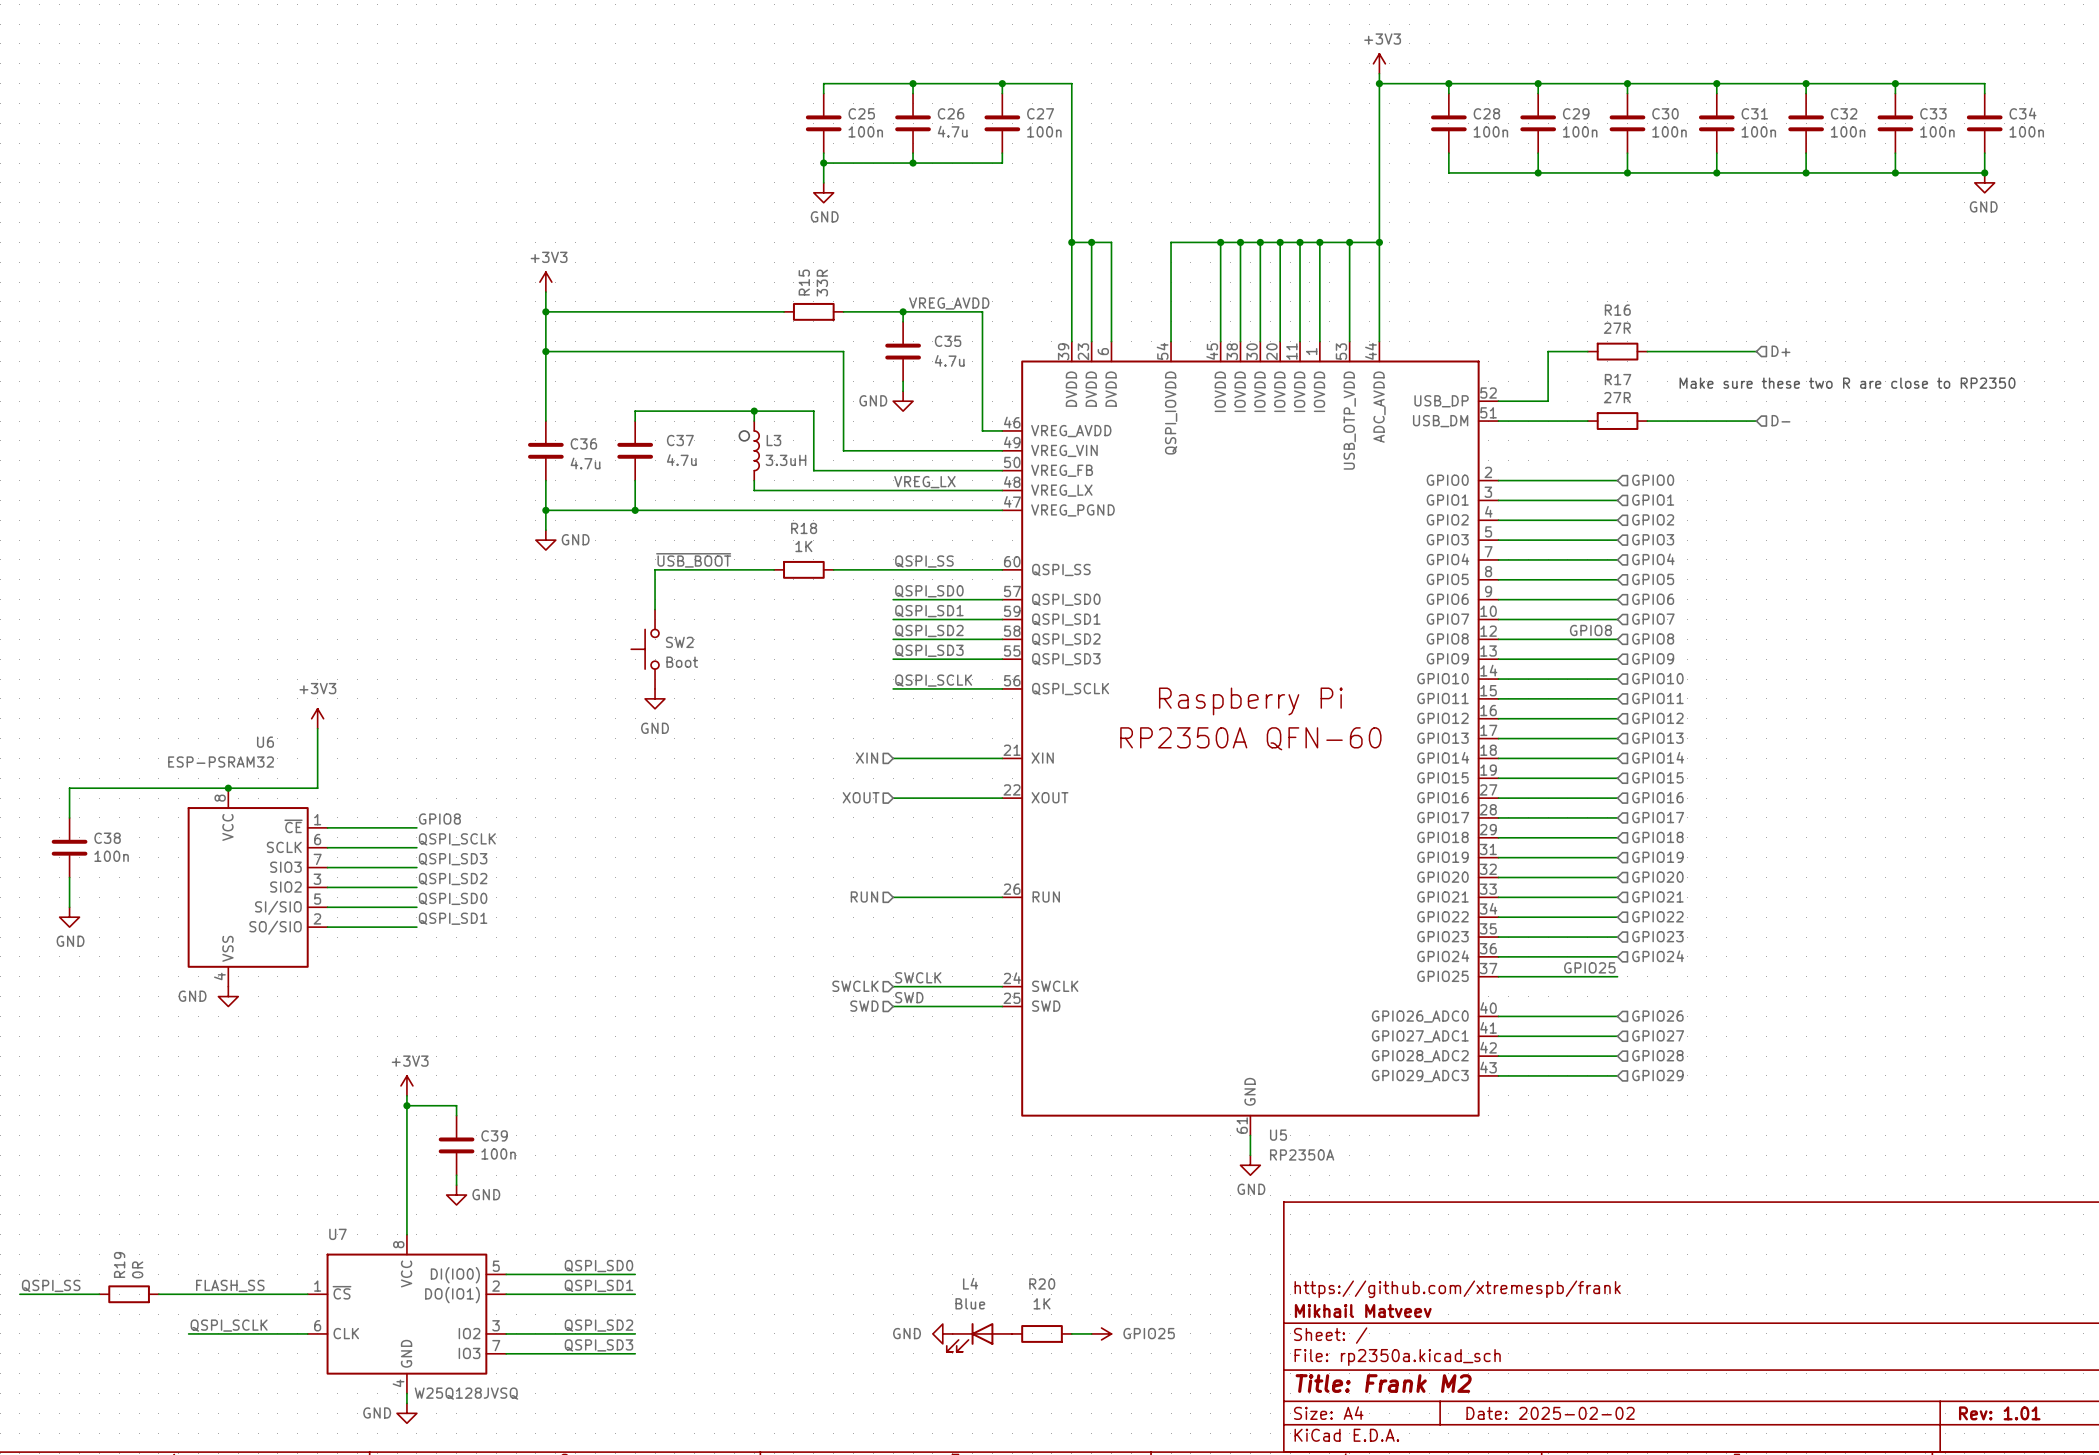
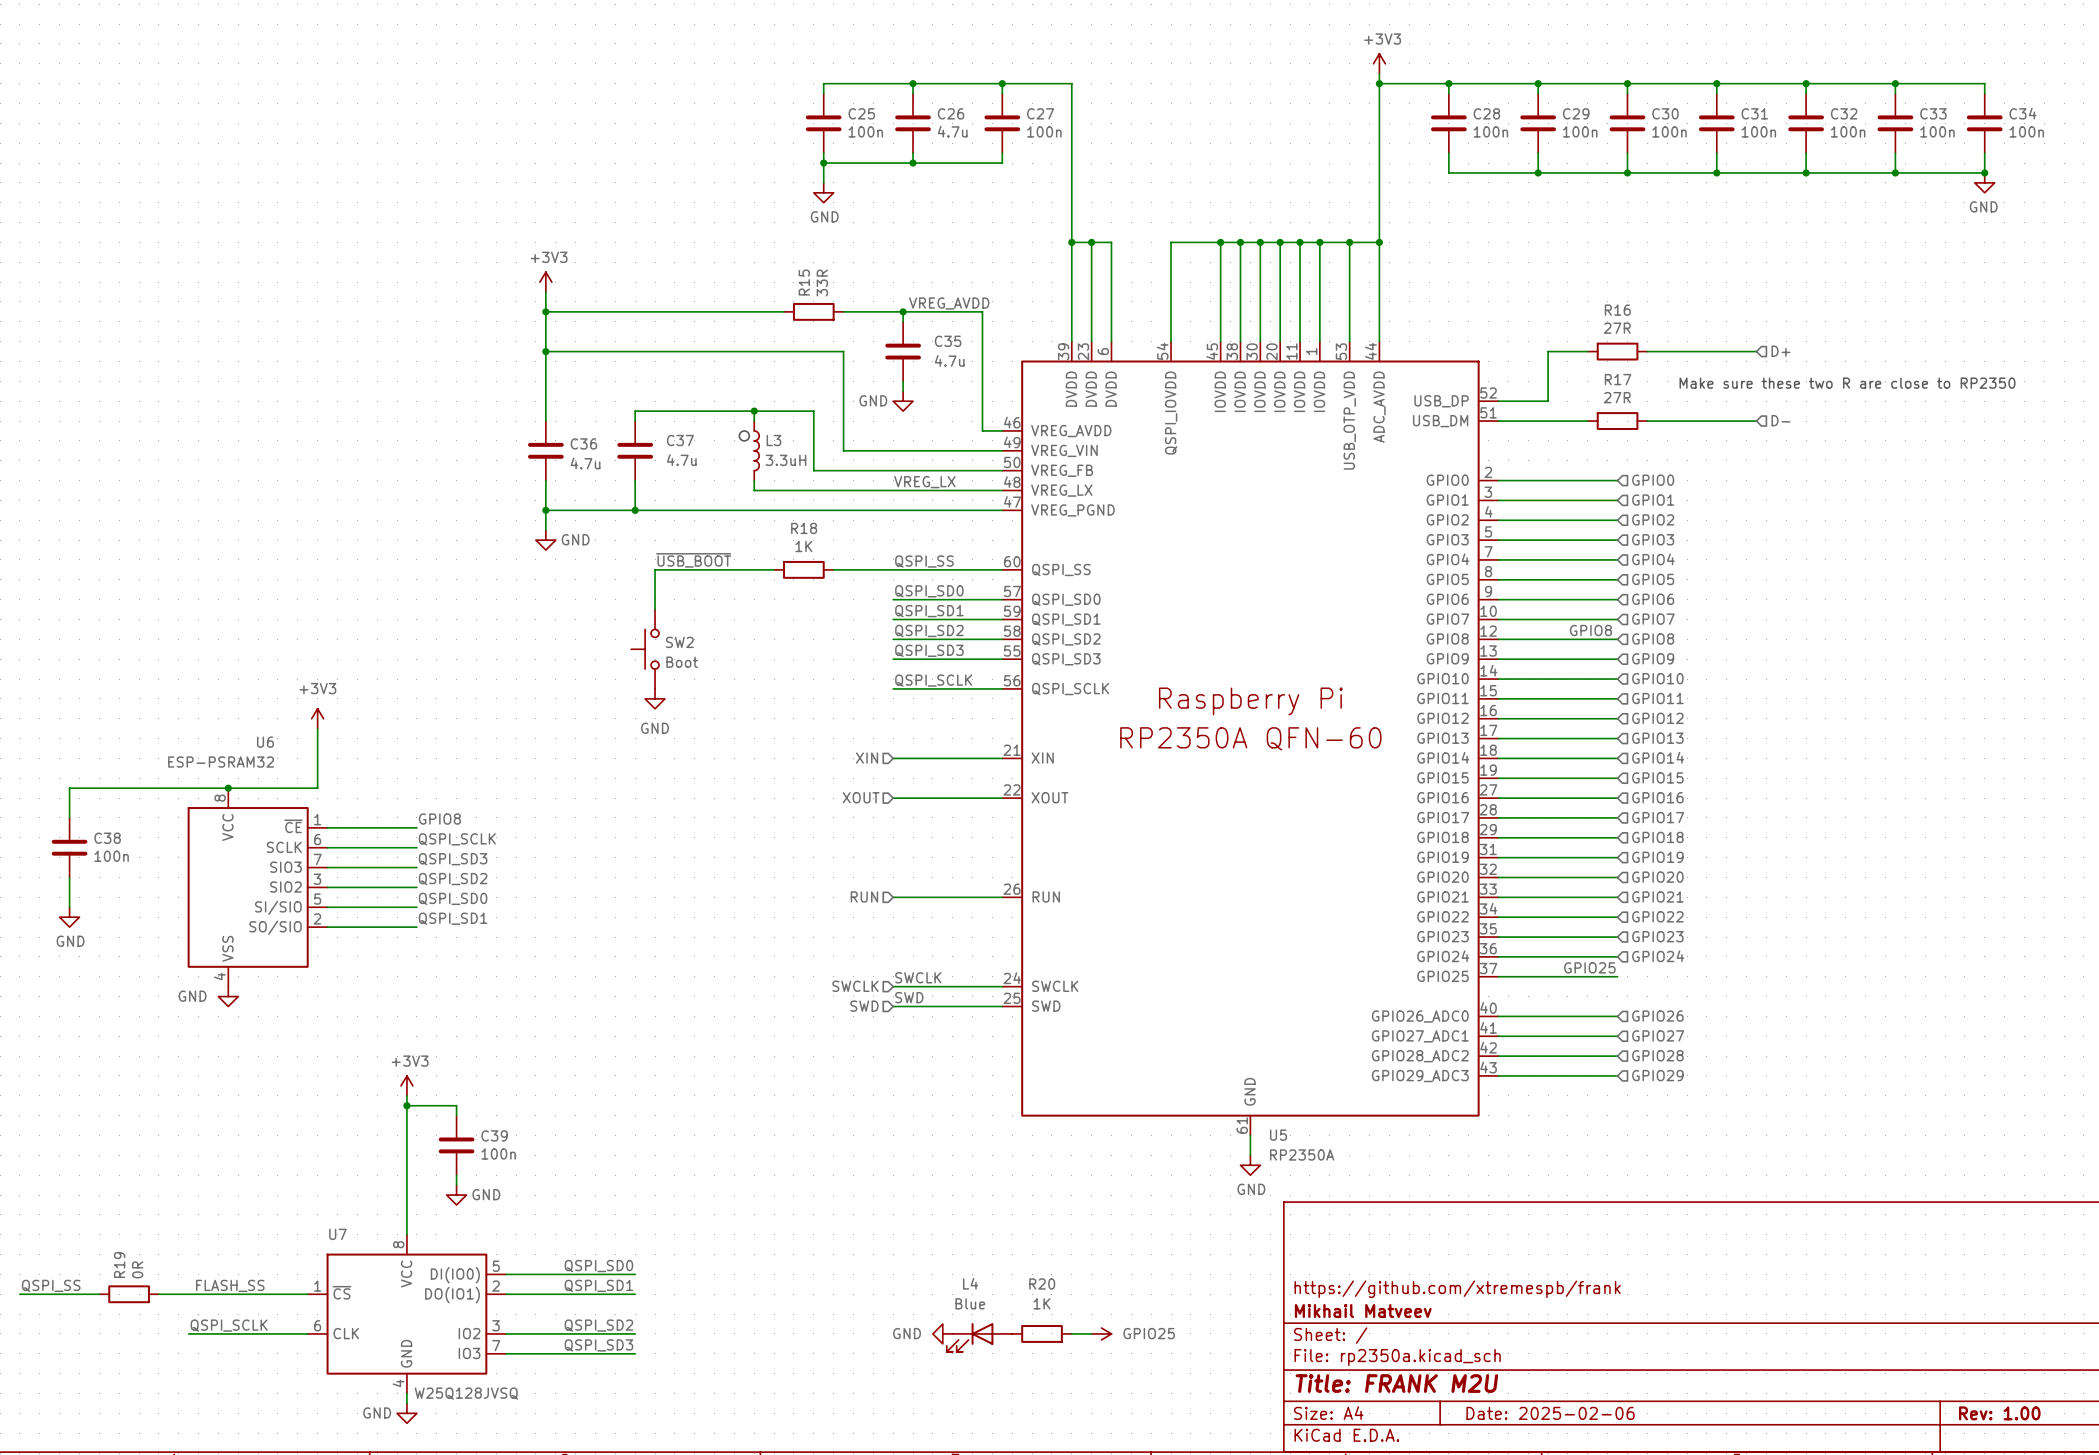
title block: Title: Frank M2 (1383, 1383) -> Title: FRANK M2U (1396, 1383)
title block: Date: 2025-02-02 (1550, 1413) -> Date: 2025-02-06 (1550, 1413)
title block: Rev: 1.01 (1999, 1413) -> Rev: 1.00 (1999, 1413)

